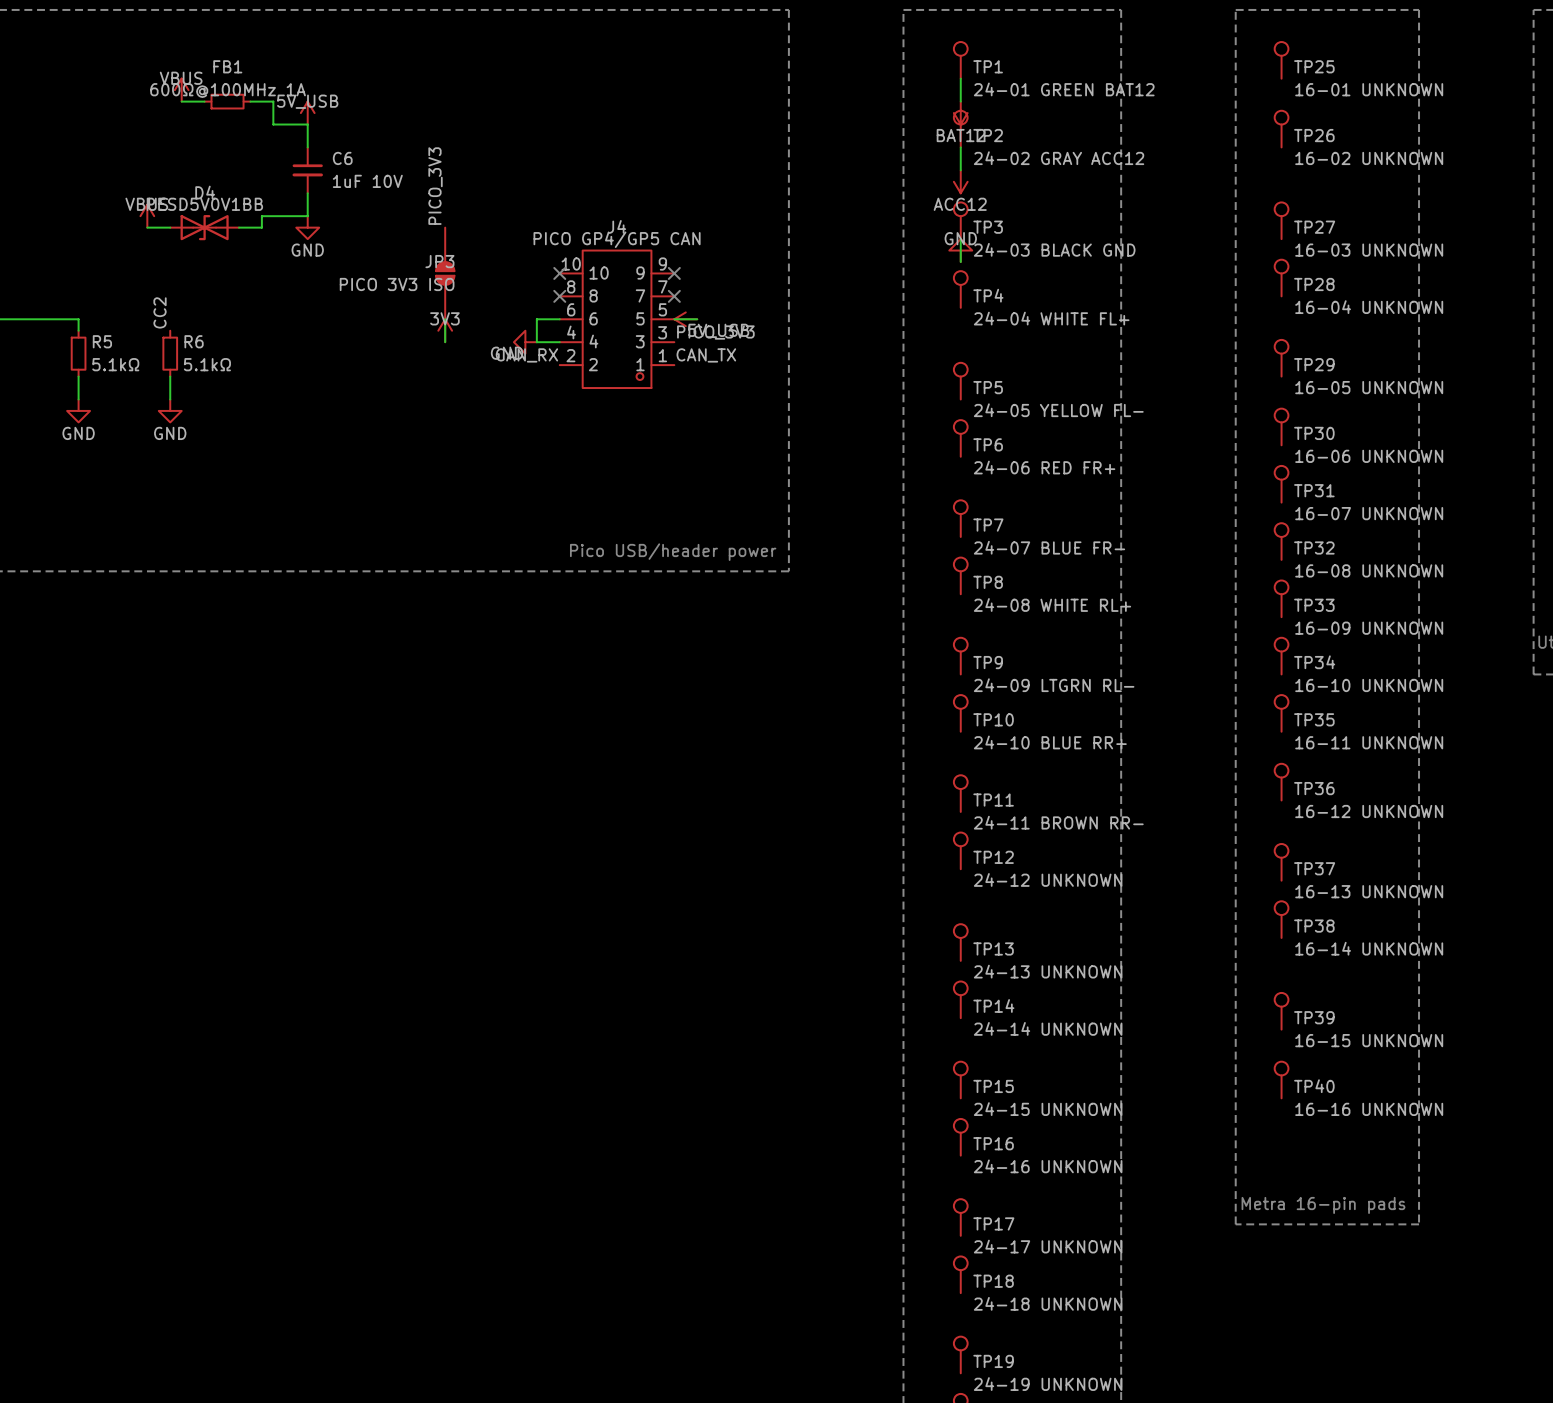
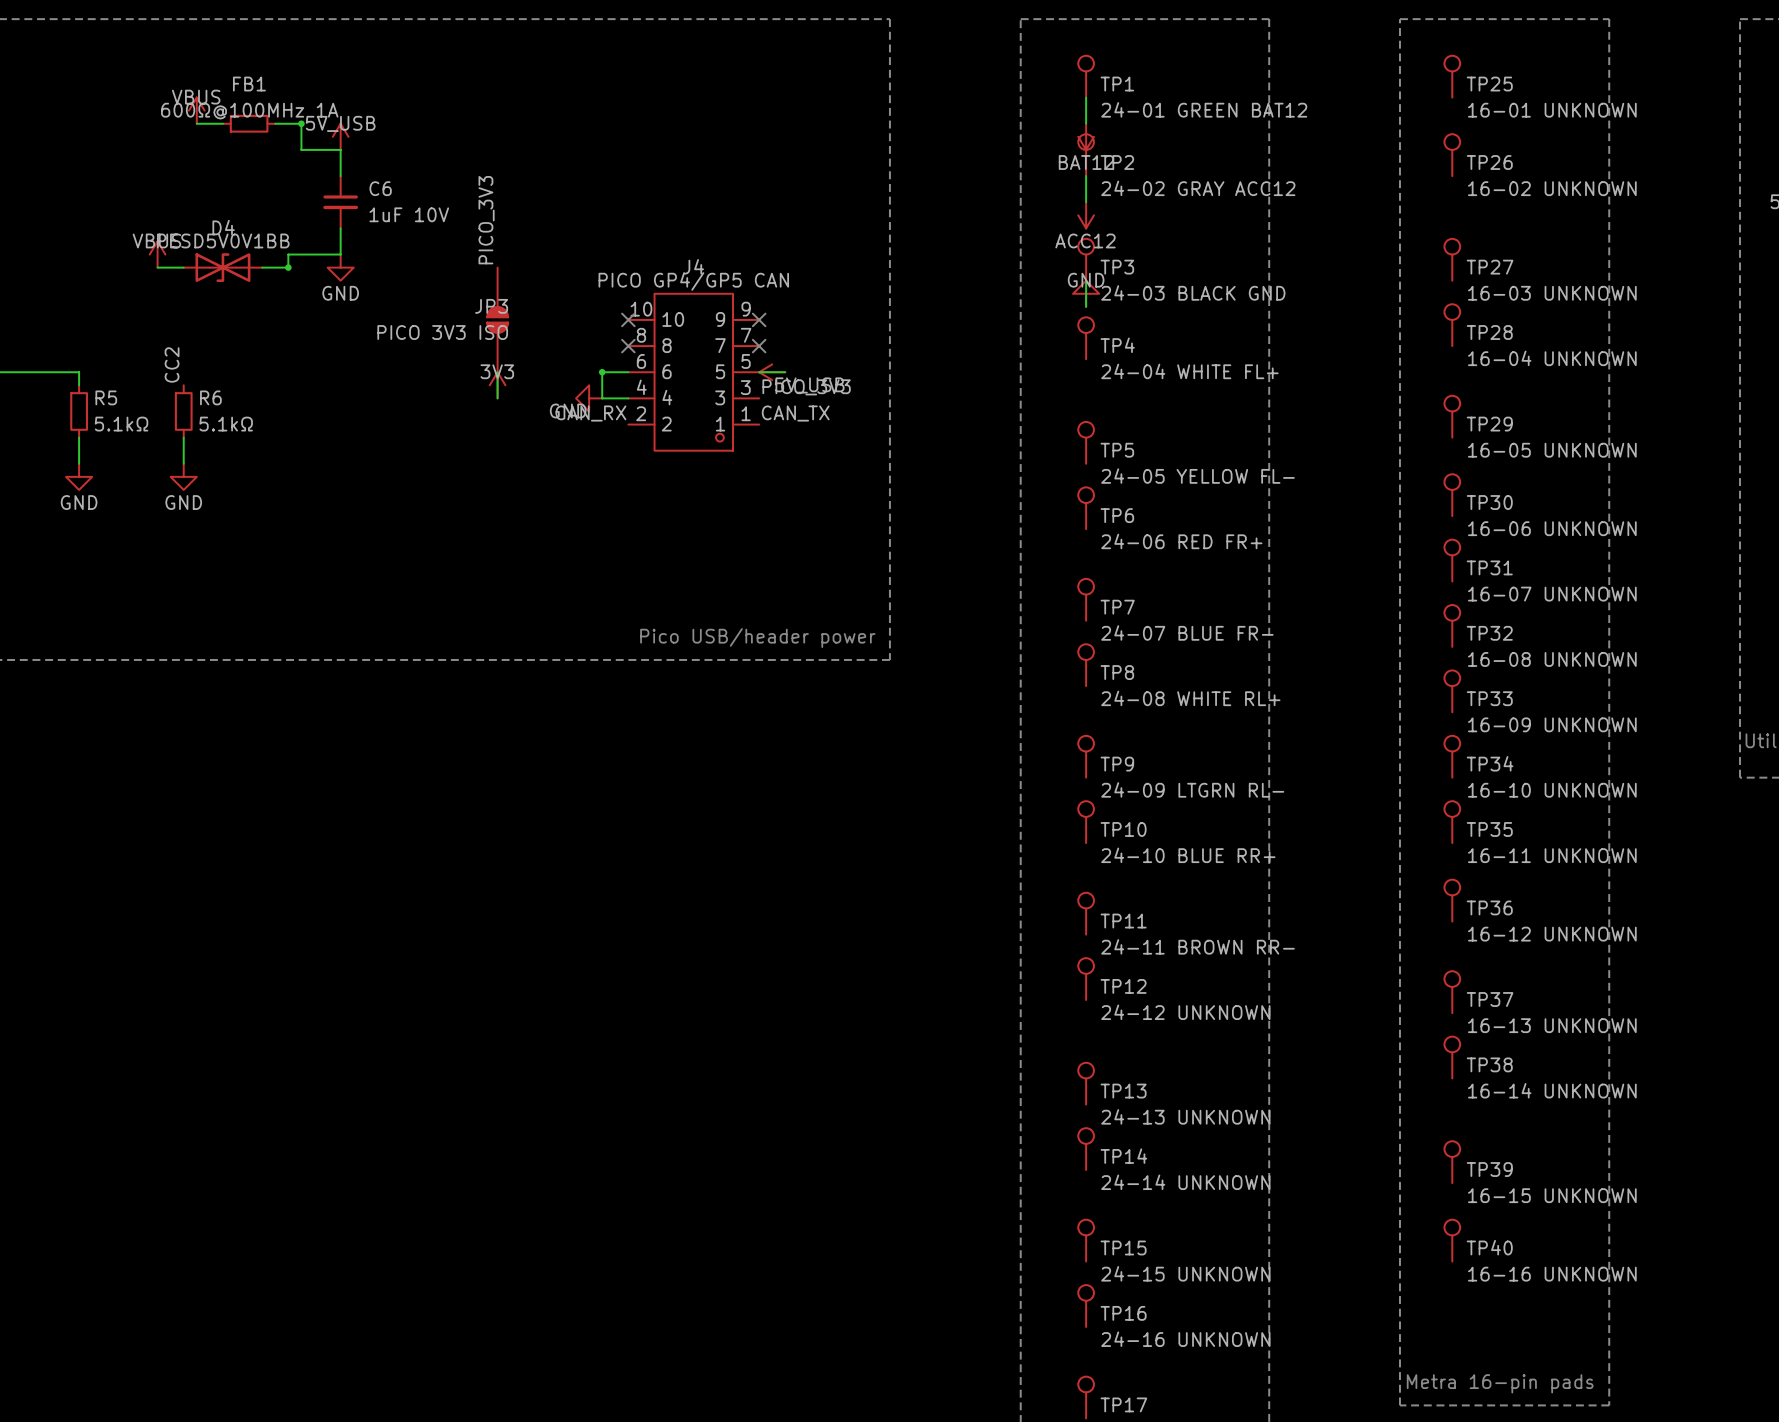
junction: none -> (301, 123)
junction: none -> (288, 267)
junction: none -> (602, 372)

